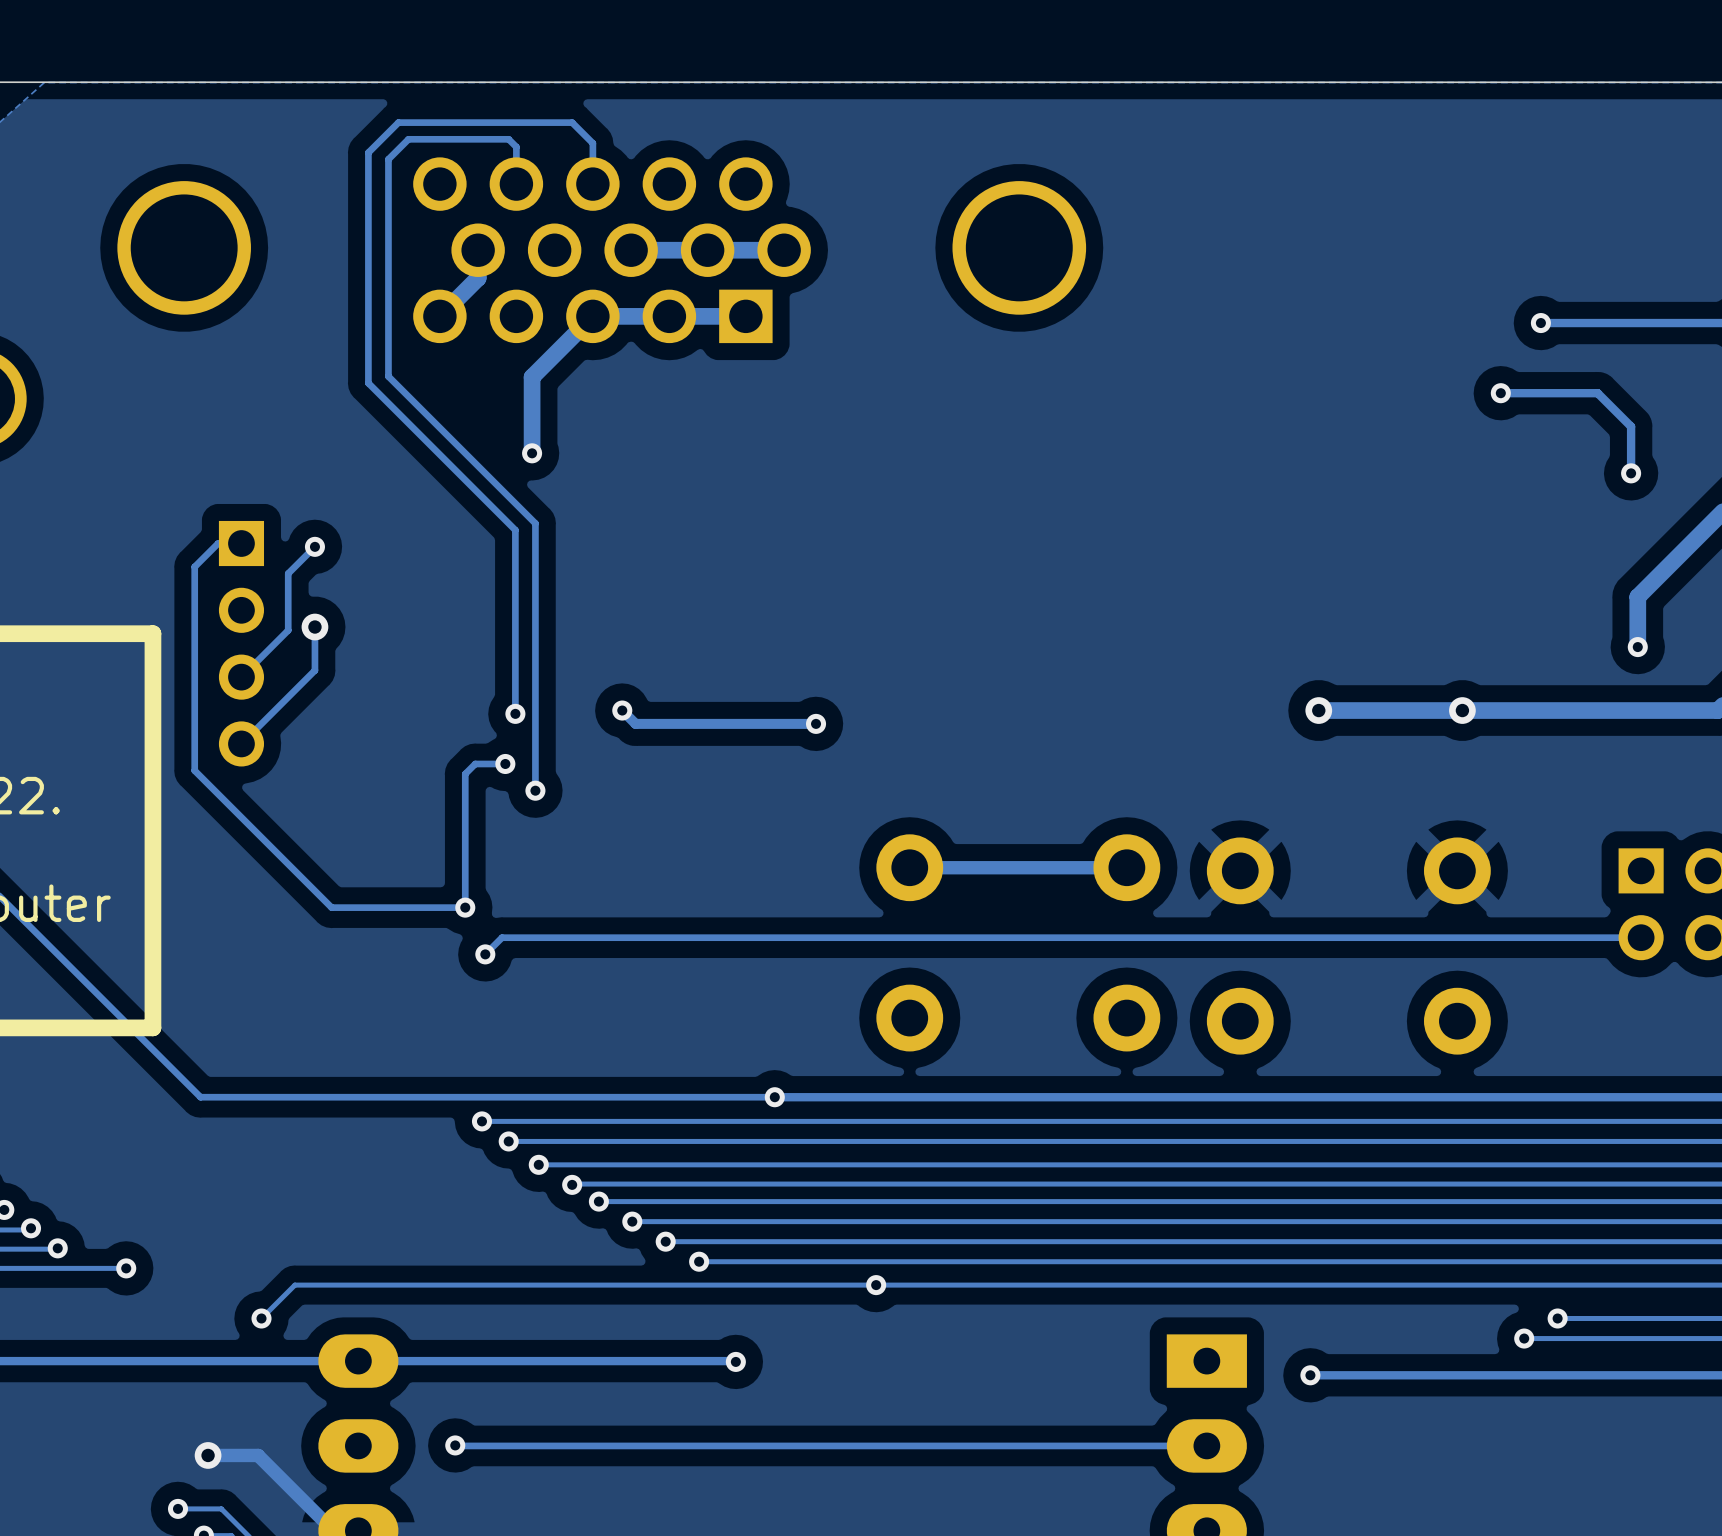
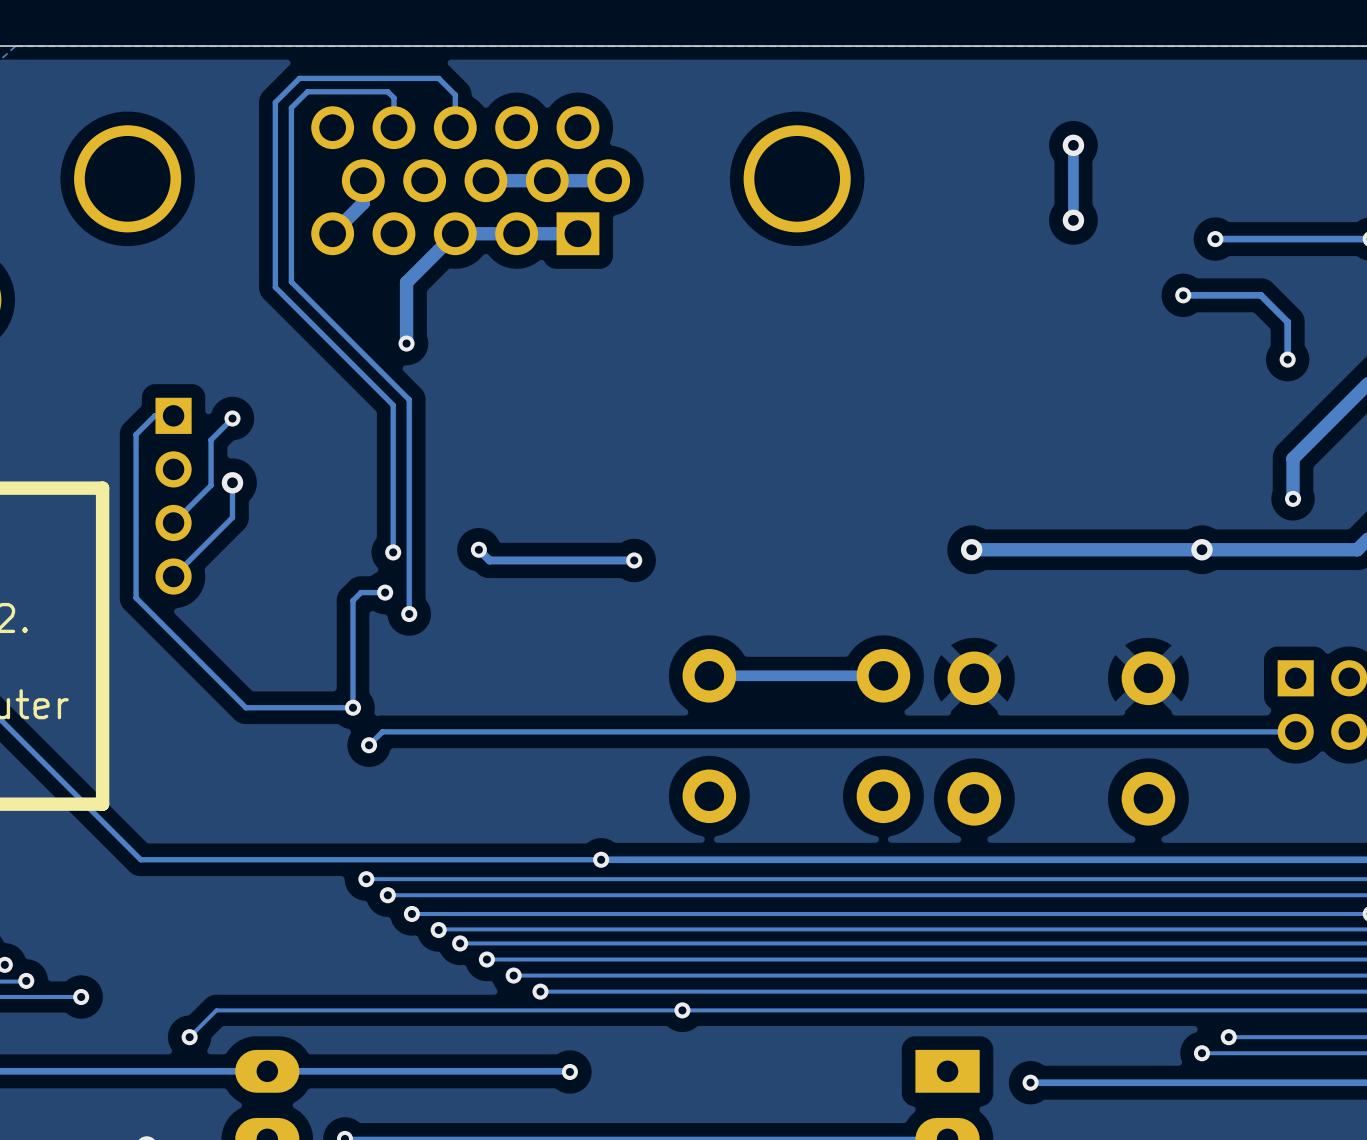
track: none -> (1073, 145) (1073, 220)
via: none -> (1073, 145)
via: none -> (1073, 220)
track: none -> (1037, 549) (971, 549)
via position: (1318, 710) -> (971, 549)
via position: (1462, 710) -> (1201, 549)

